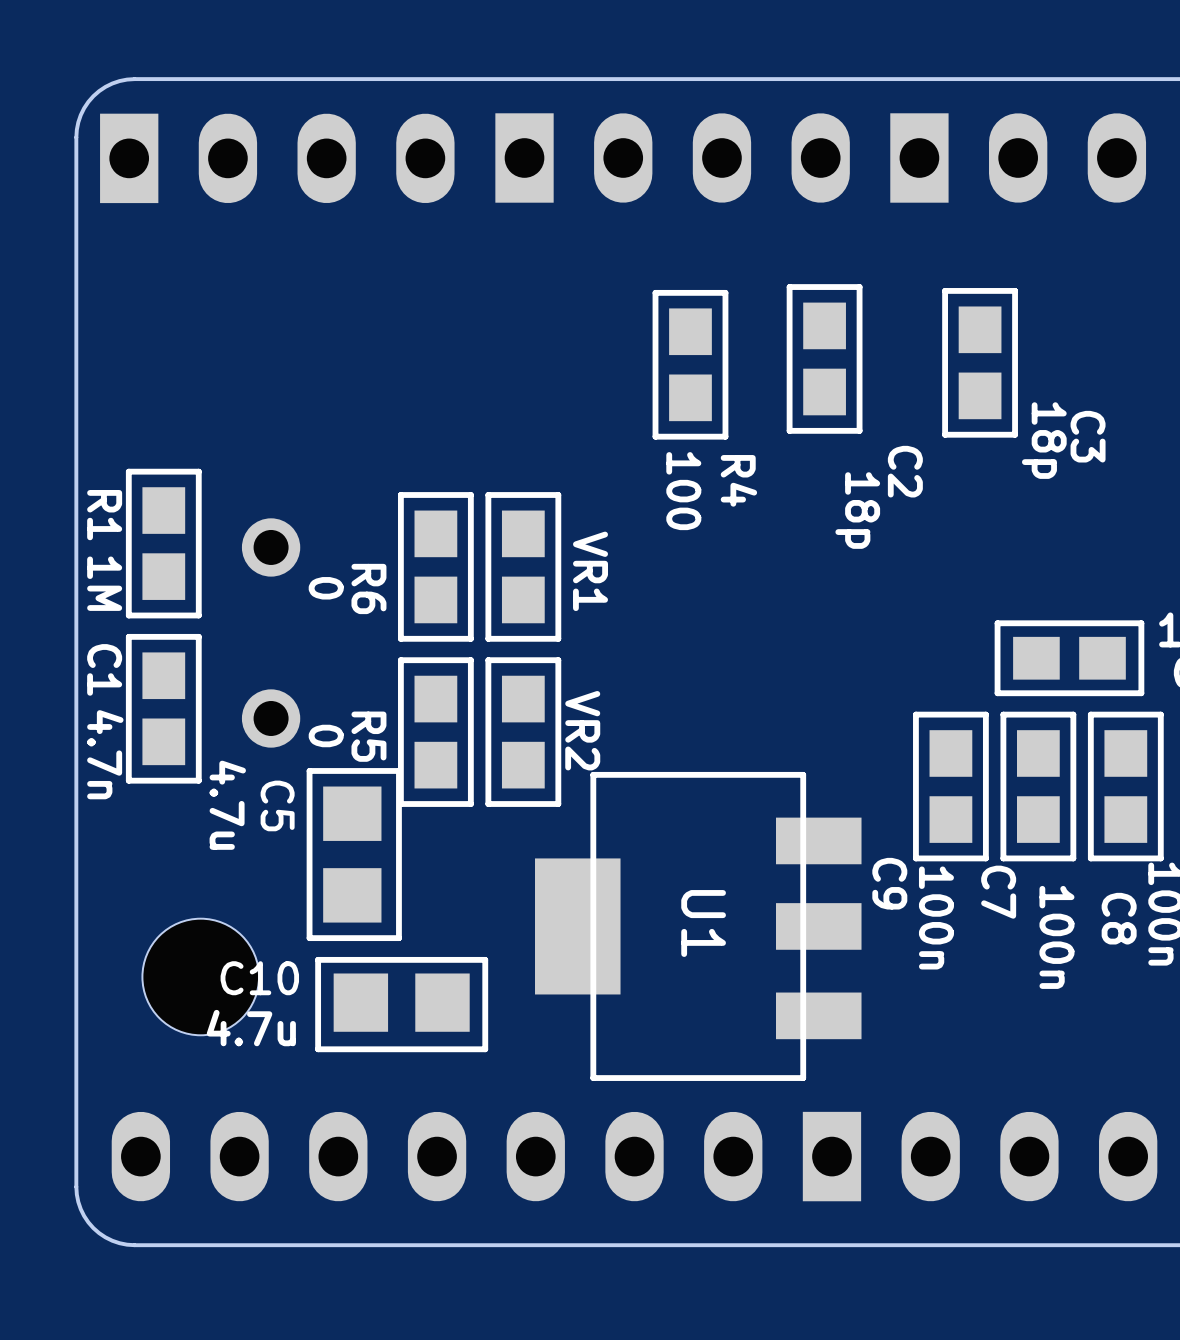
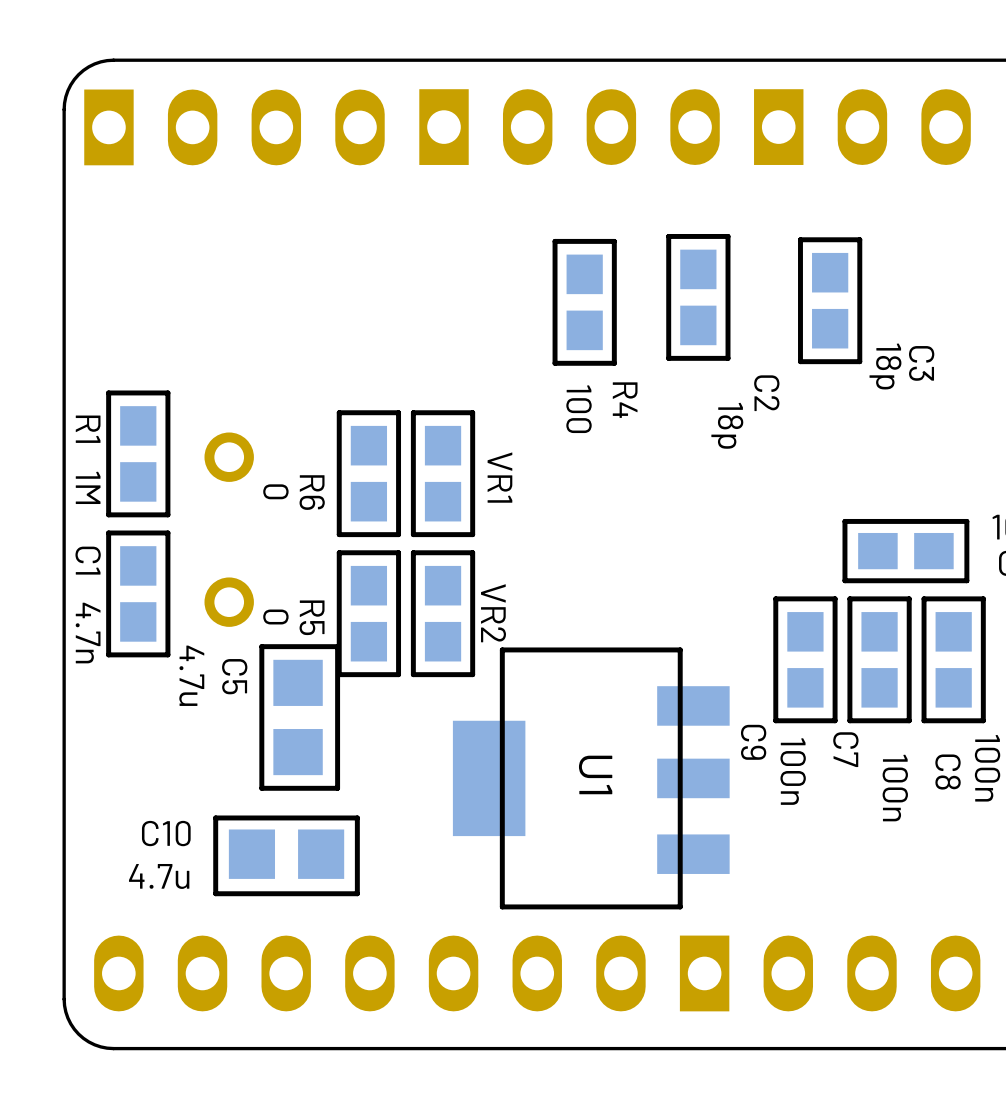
part: (200, 976) -> none
C10 position: (401, 1004) -> (286, 855)

